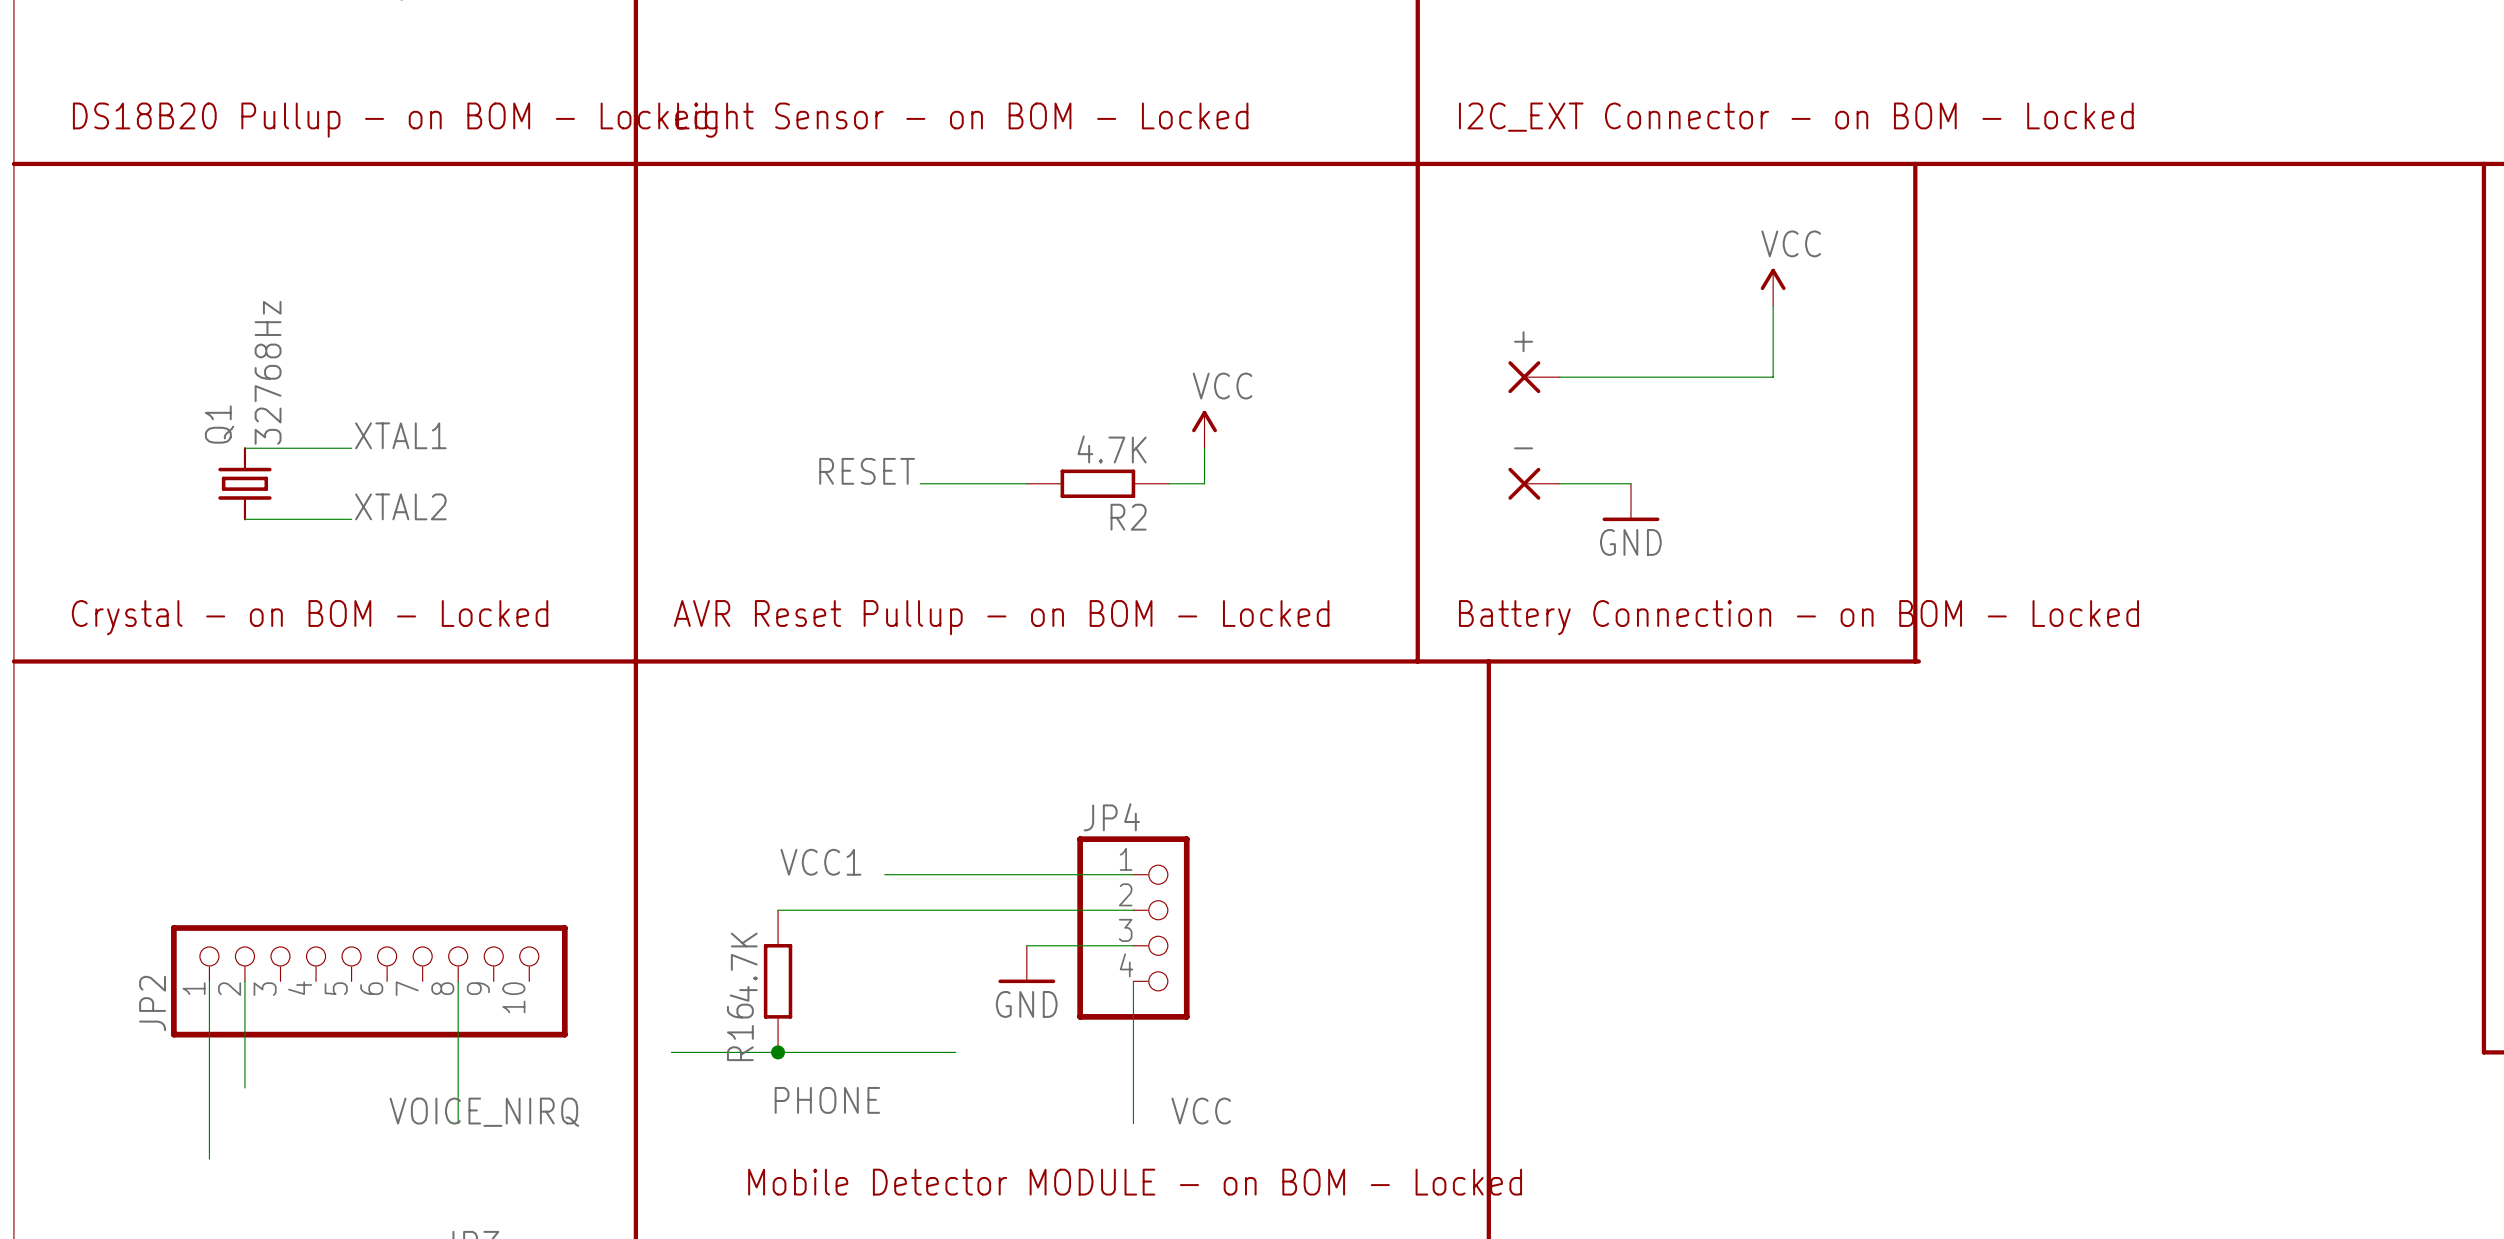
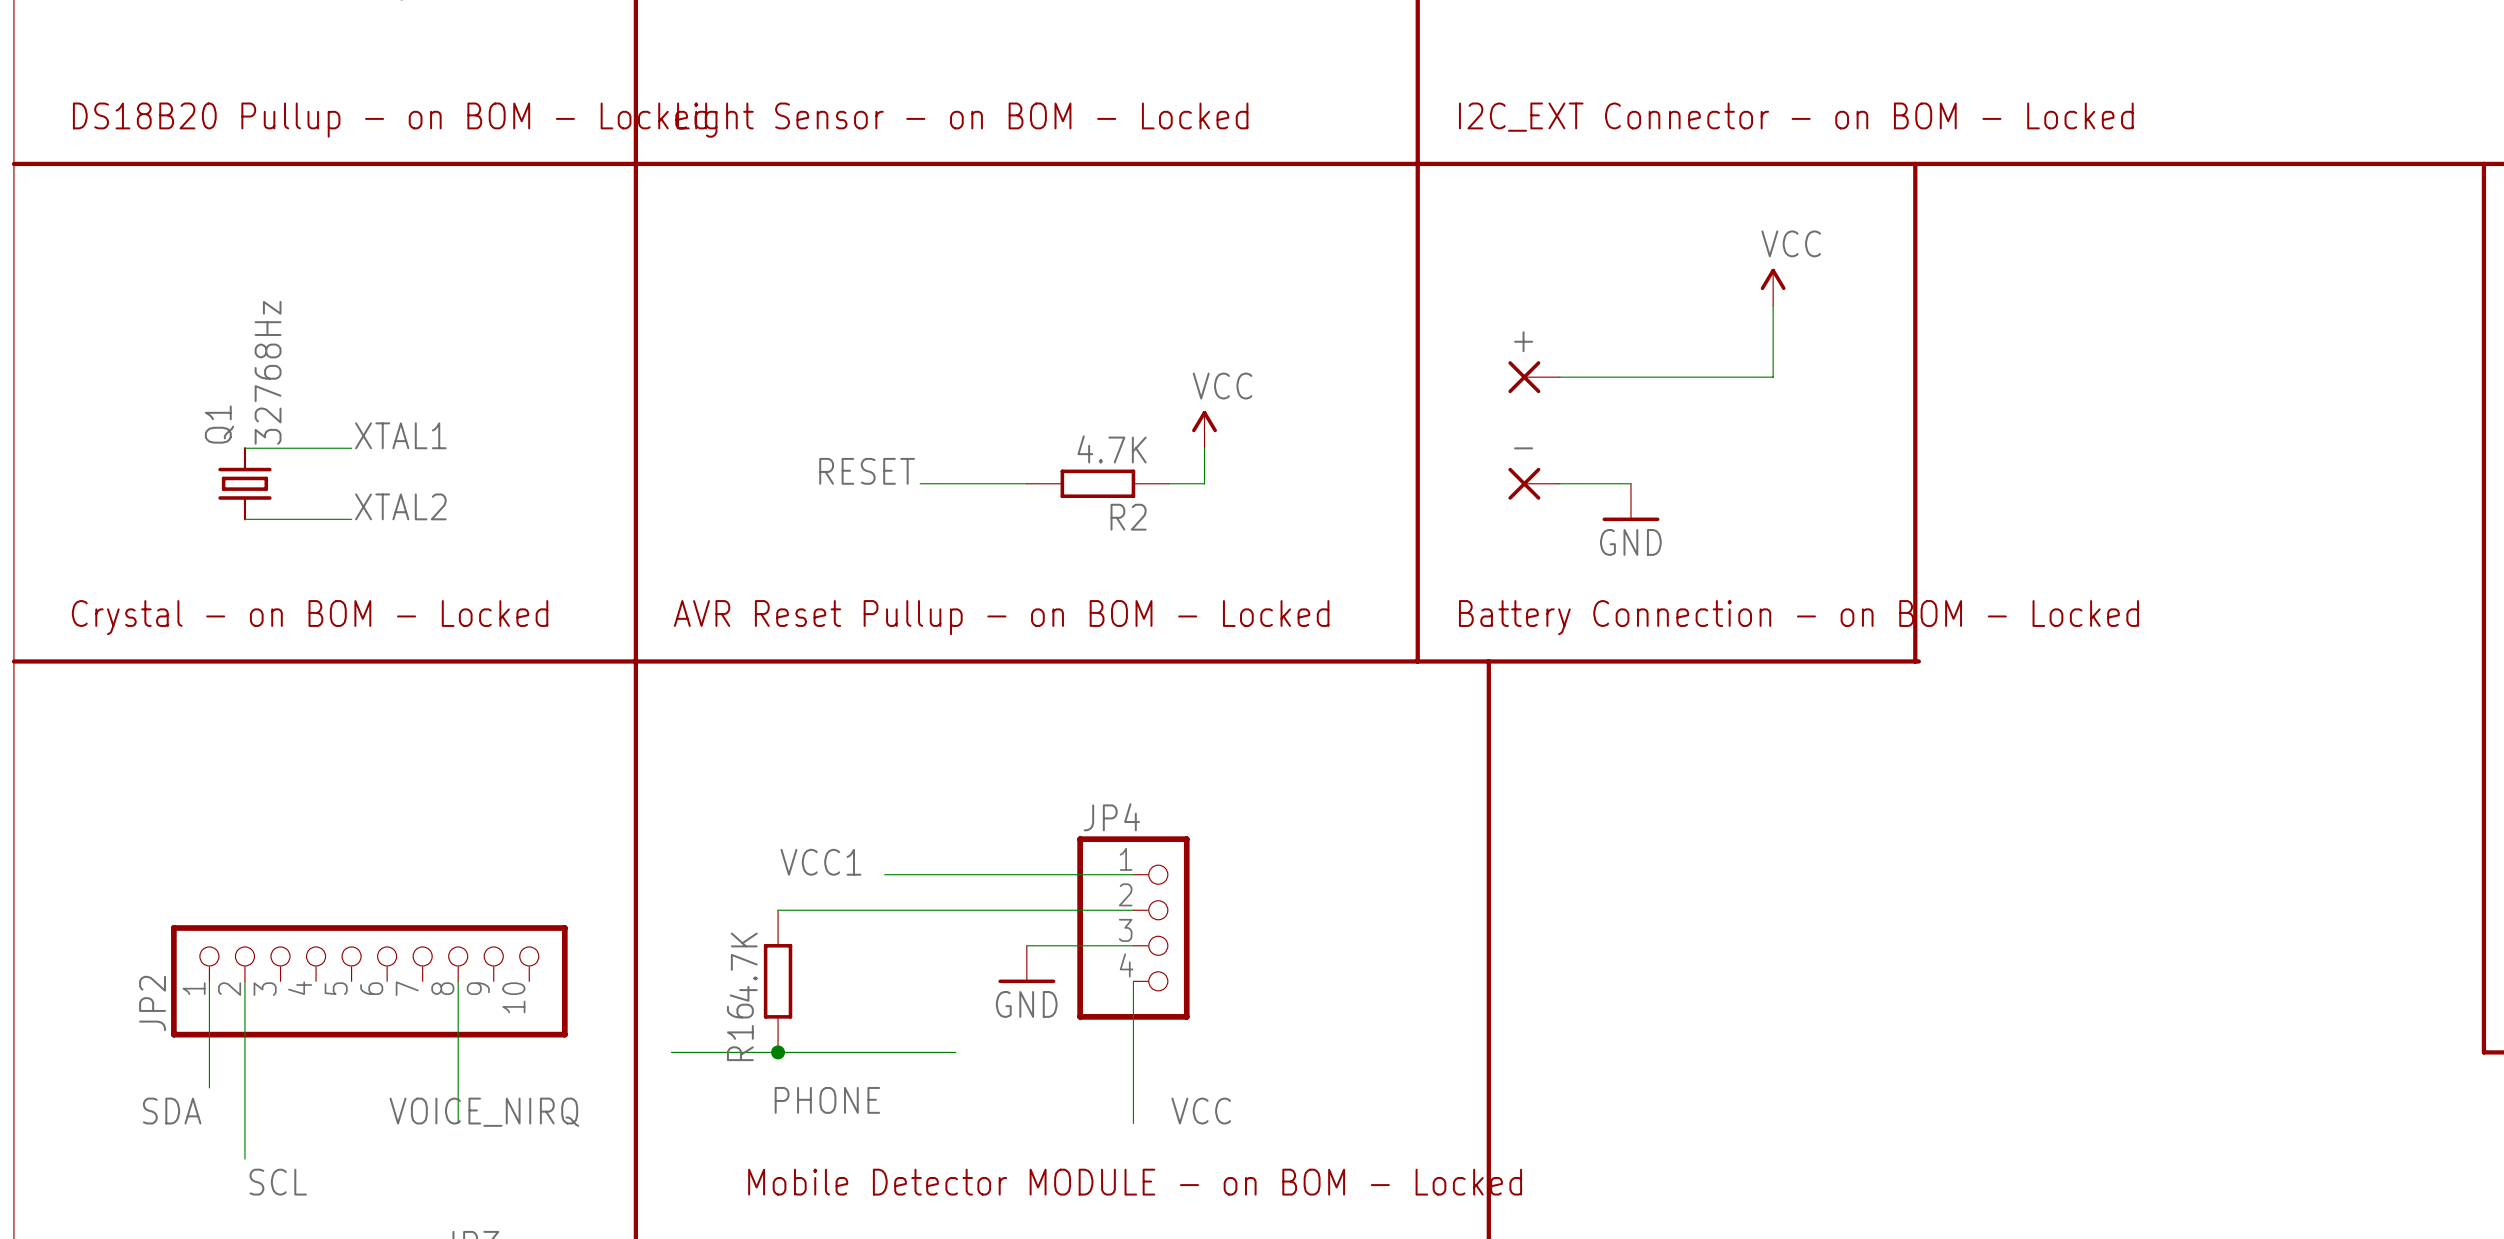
wire: (209, 1087) (209, 1159) -> (244, 1087) (244, 1159)
label: none -> SDA (172, 1111)
label: none -> SCL (278, 1182)

